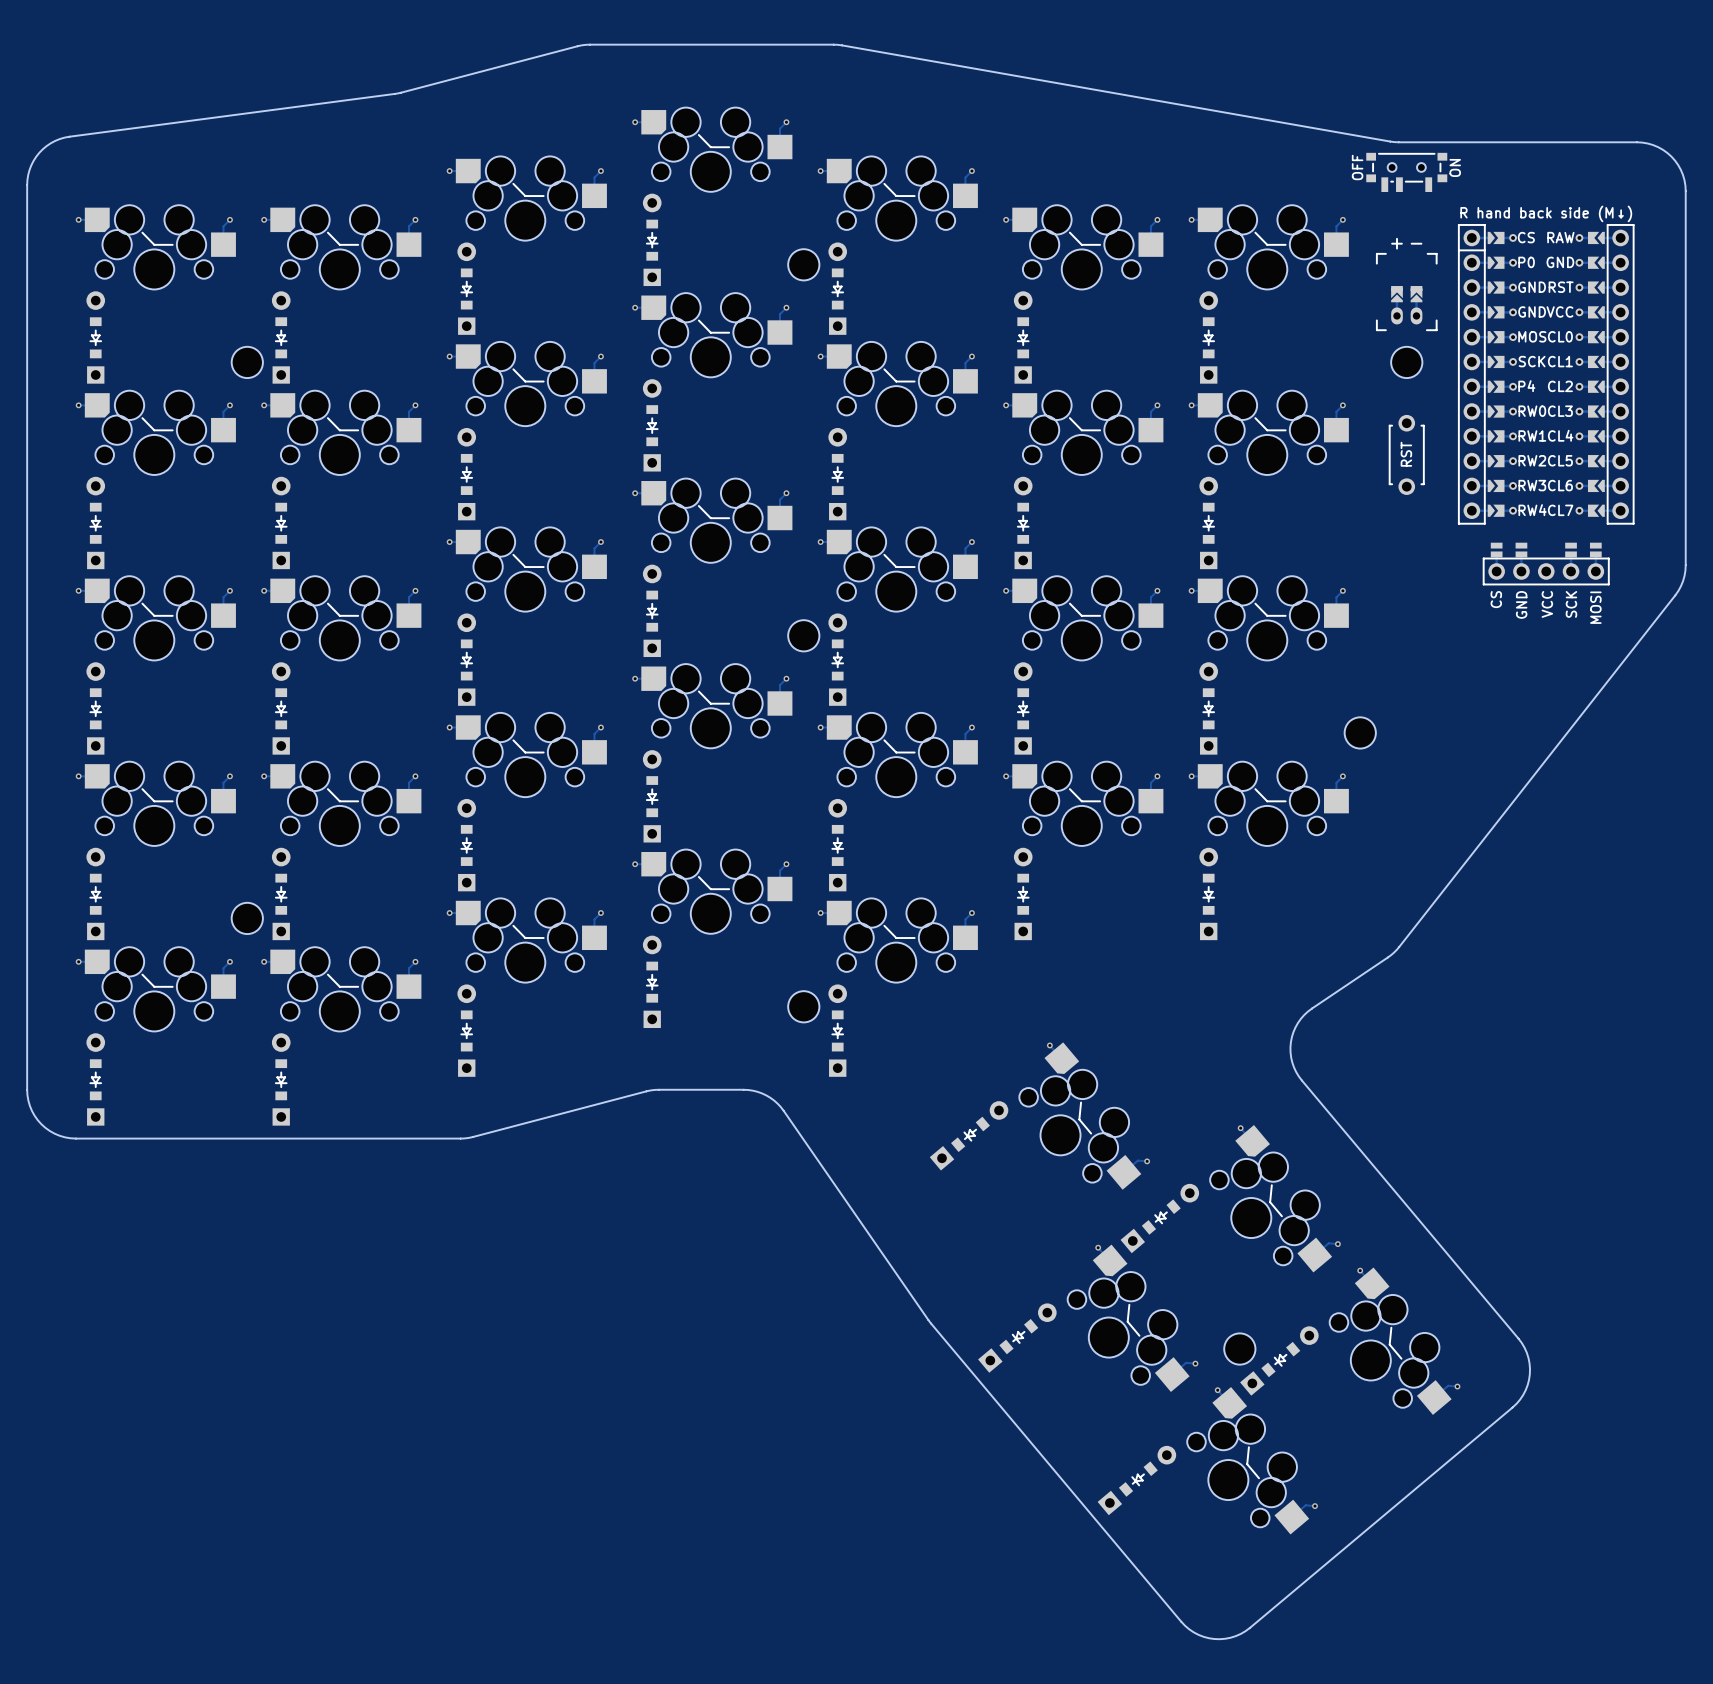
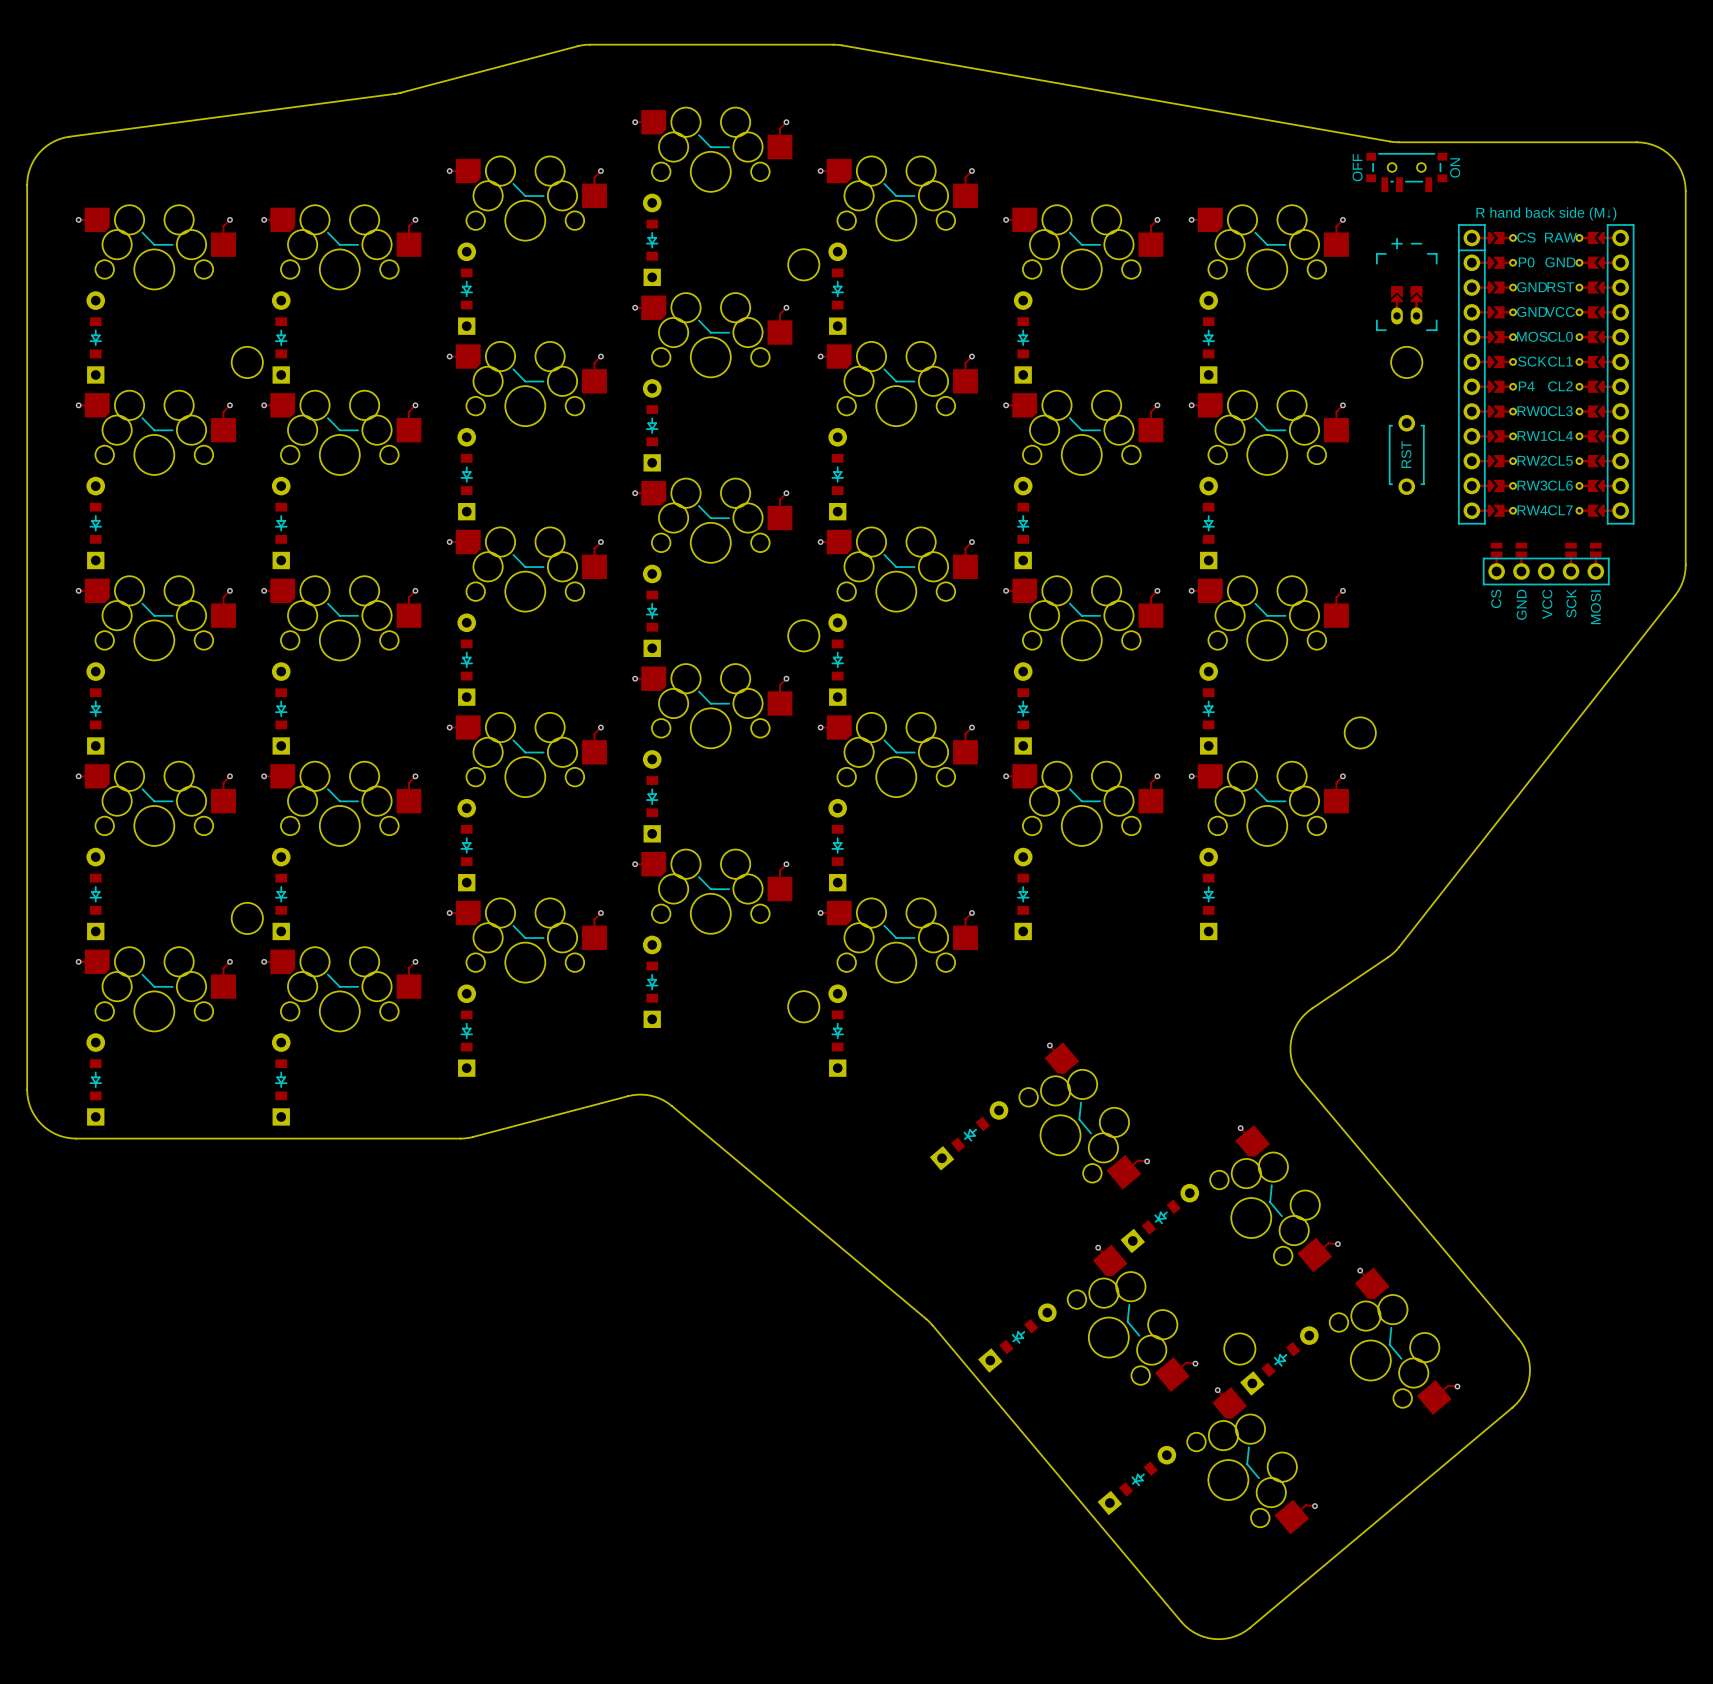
board edge: (628, 1096) (655, 1089) (743, 1089) (757, 1091) (774, 1100) (783, 1110) (932, 1325) -> (628, 1096) (646, 1094) (668, 1103) (932, 1325)

